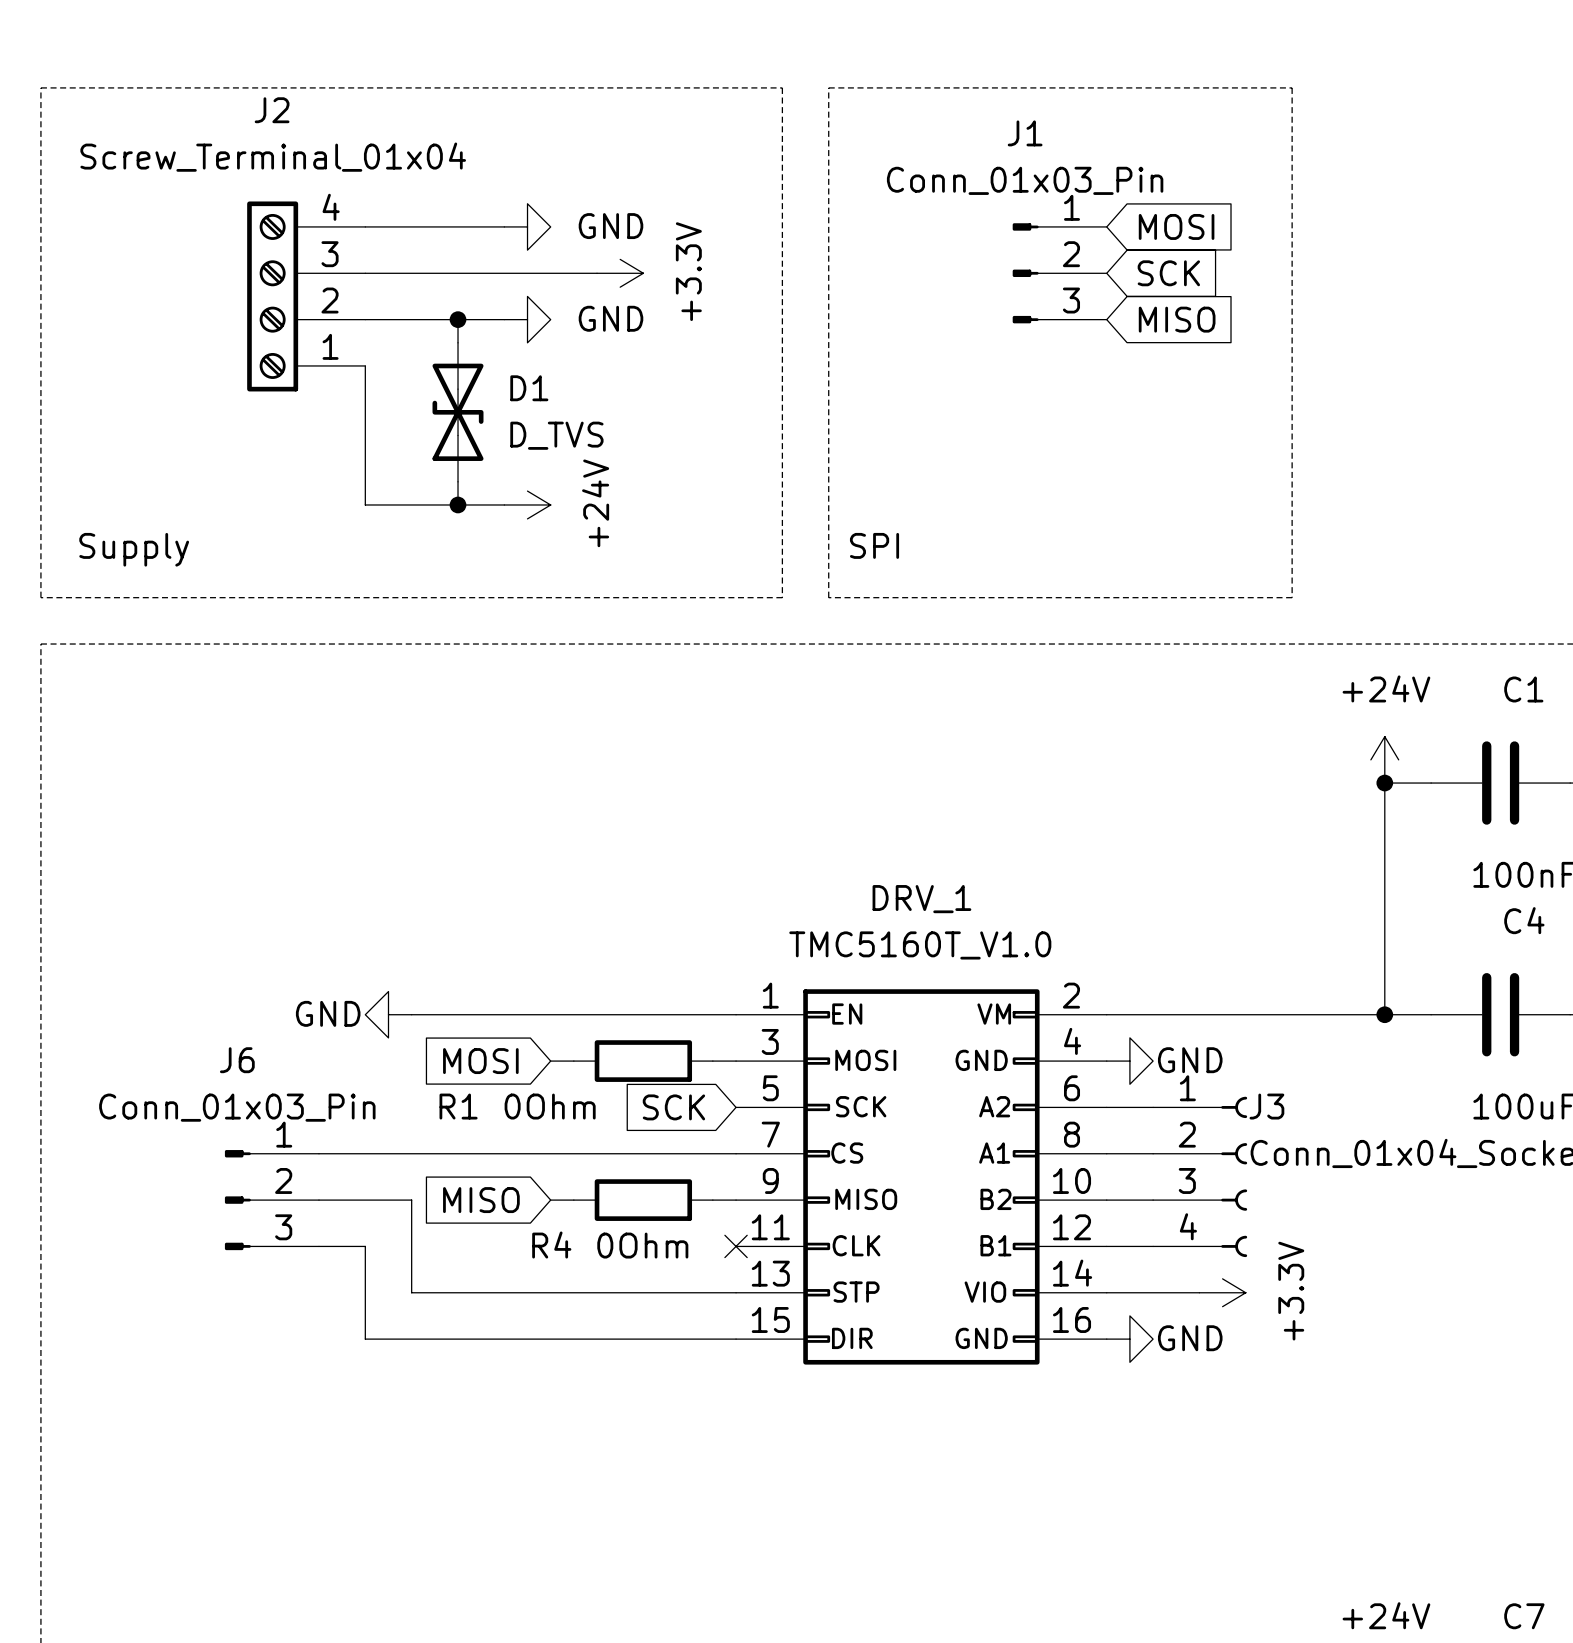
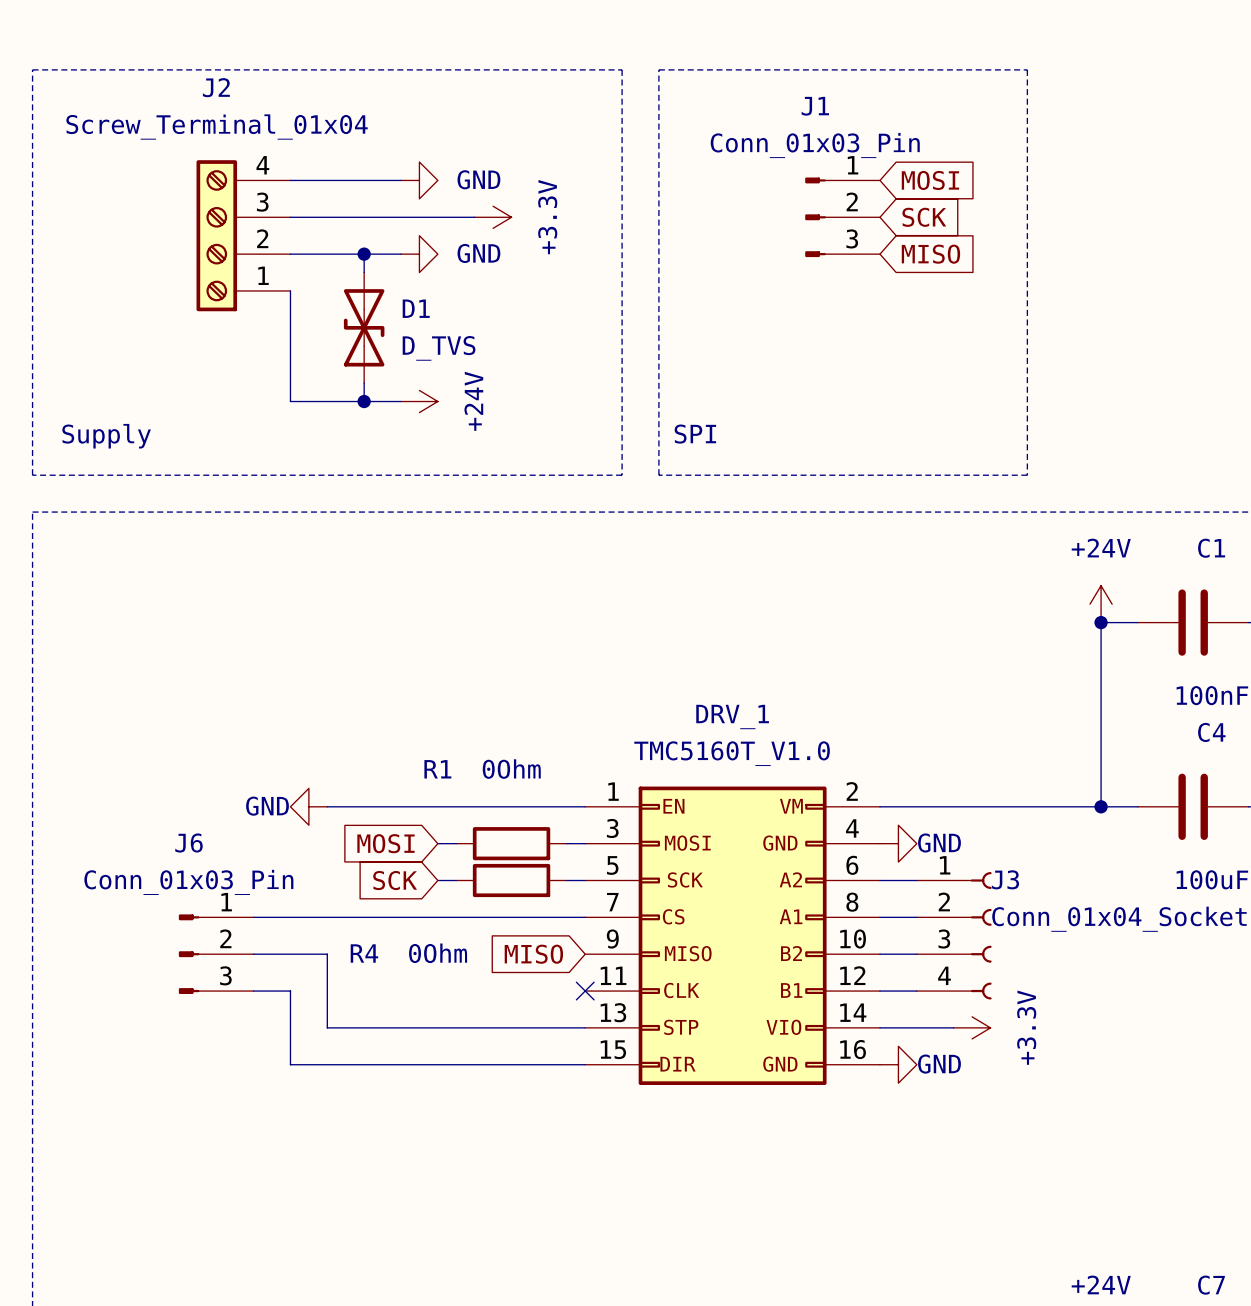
R1 name position: R1 (458, 1106) -> R1 (437, 769)
R1 value position: 0Ohm (550, 1106) -> 0Ohm (511, 769)
global label position: SCK (673, 1107) -> SCK (395, 880)
global label position: MISO (481, 1200) -> MISO (533, 954)
wire: (550, 1200) (573, 1200) -> (437, 880) (456, 880)
R4 position: (643, 1200) -> (511, 880)
wire: (712, 1200) (736, 1200) -> (566, 880) (585, 880)
R4 name position: R4 (551, 1245) -> R4 (364, 953)
R4 value position: 0Ohm (642, 1245) -> 0Ohm (438, 953)

